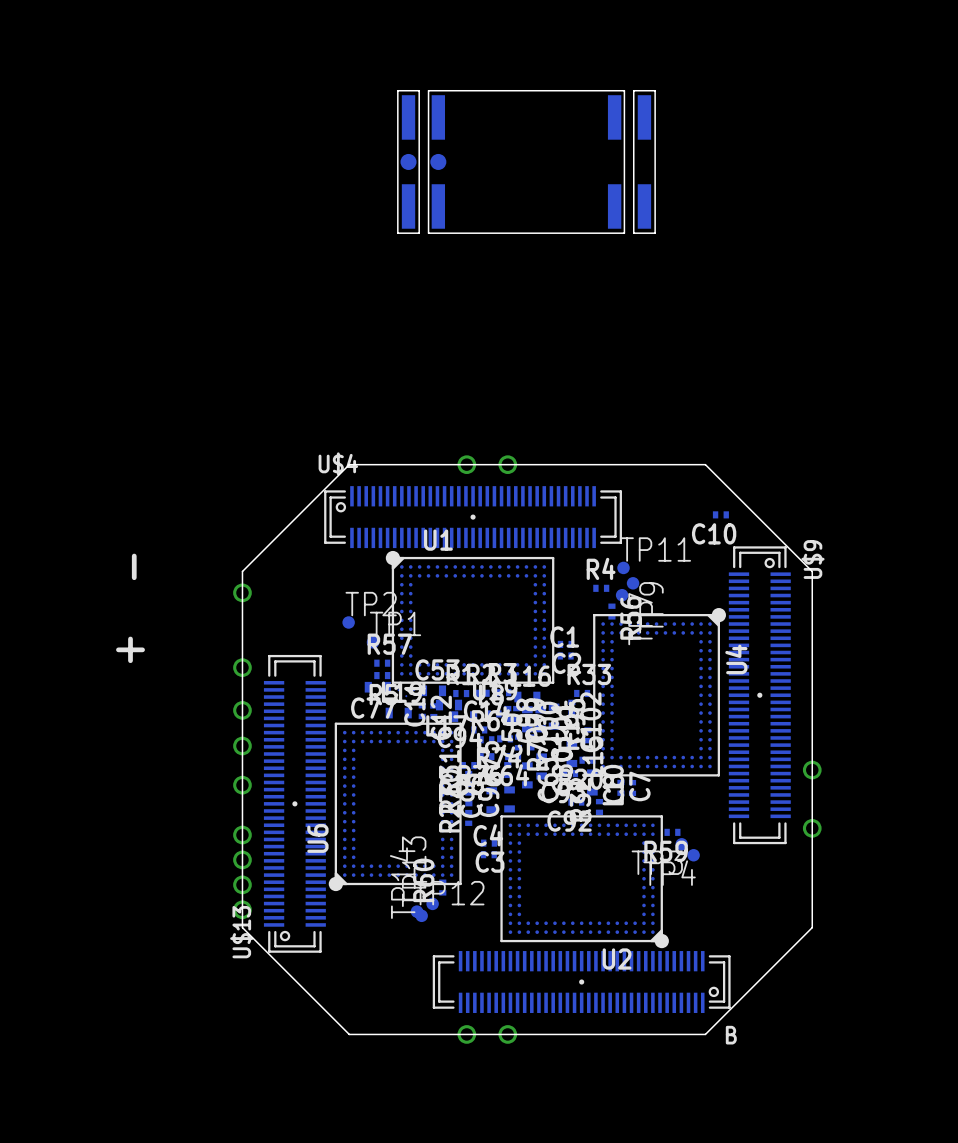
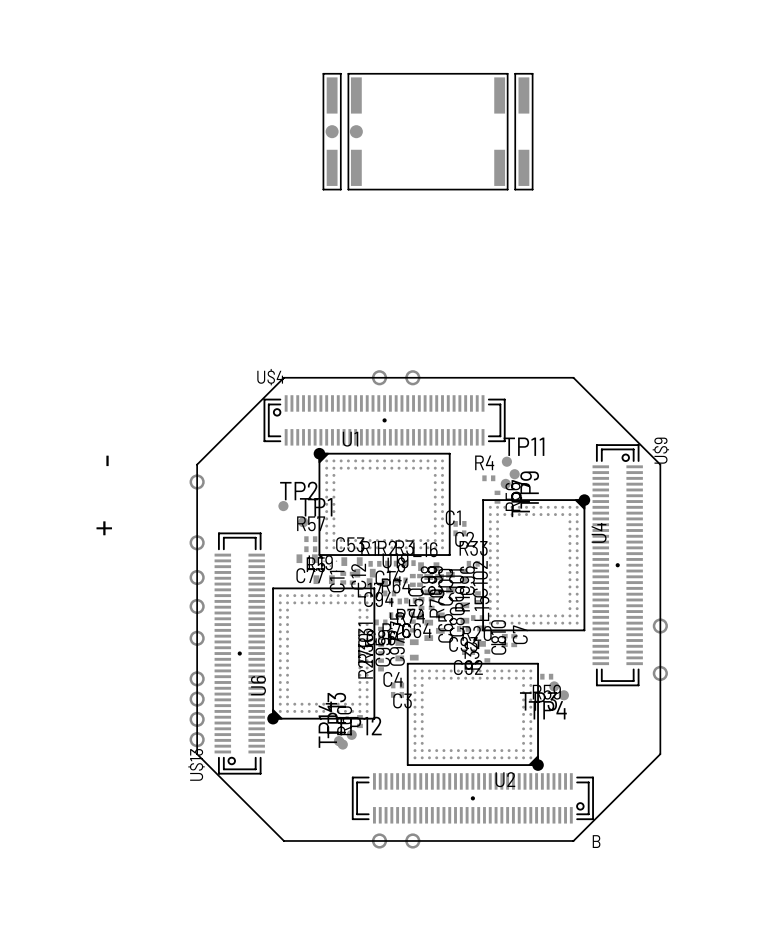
C10: (720, 514) -> none

